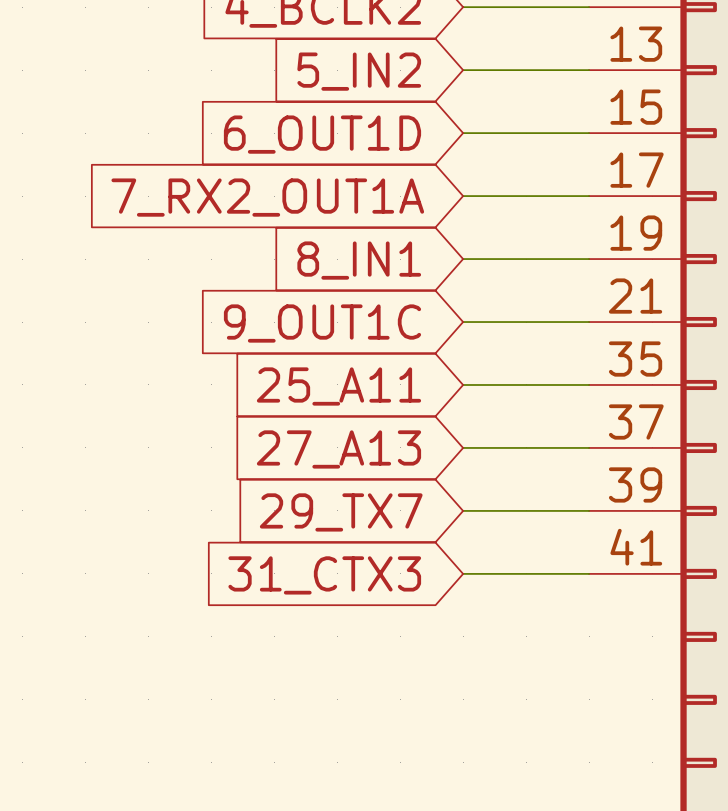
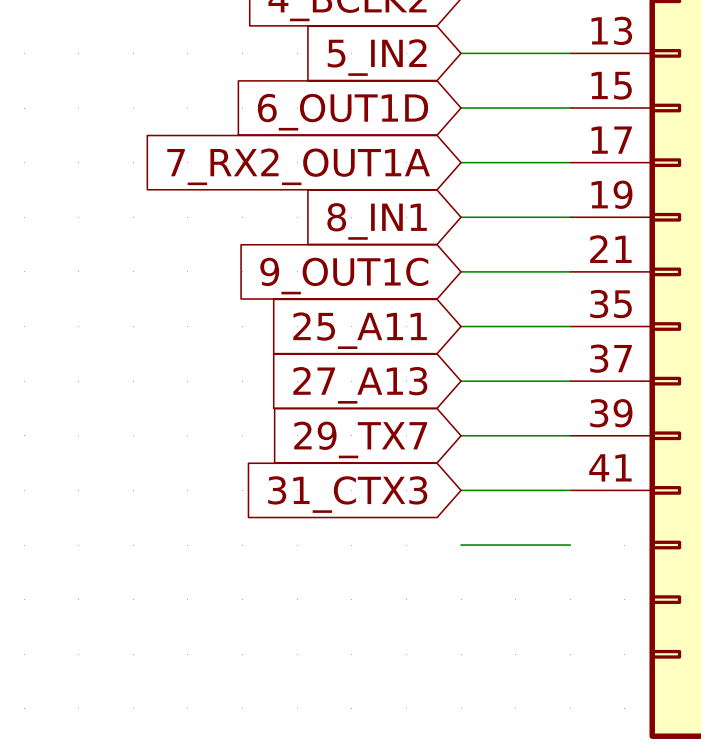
wire: none -> (461, 545) (570, 545)

